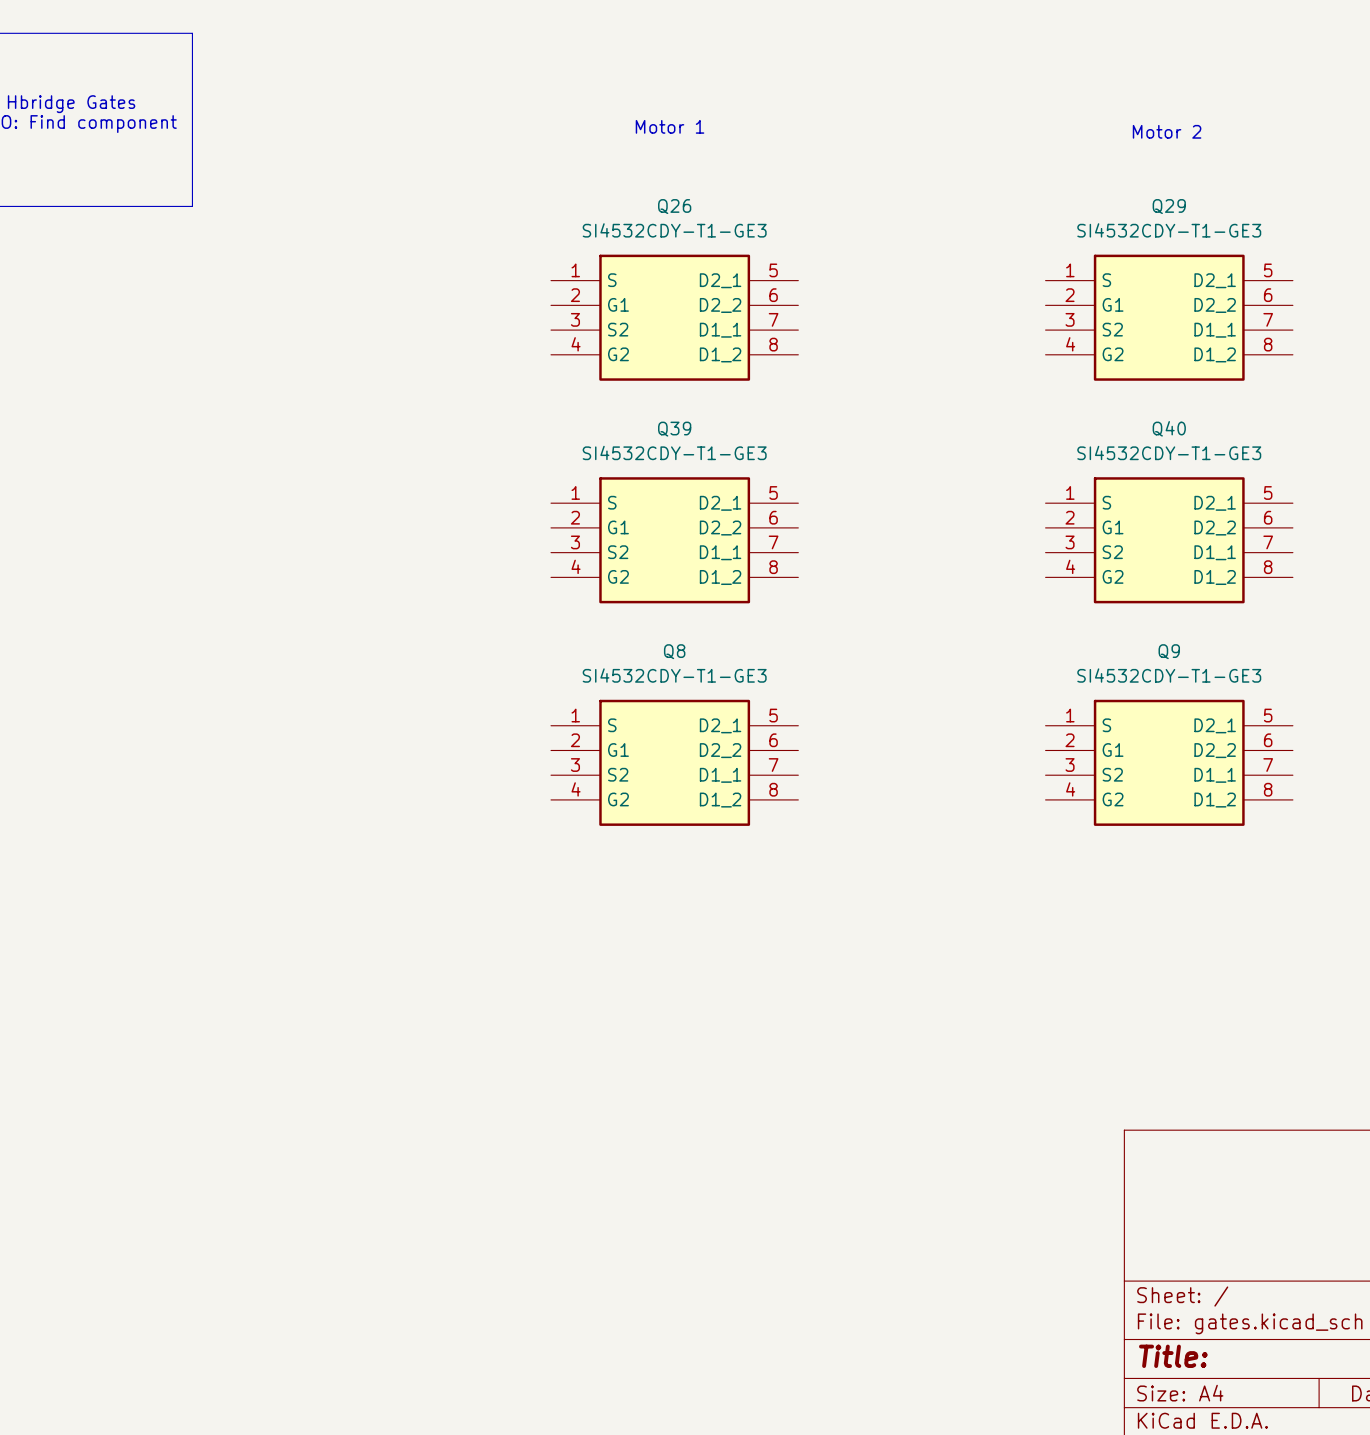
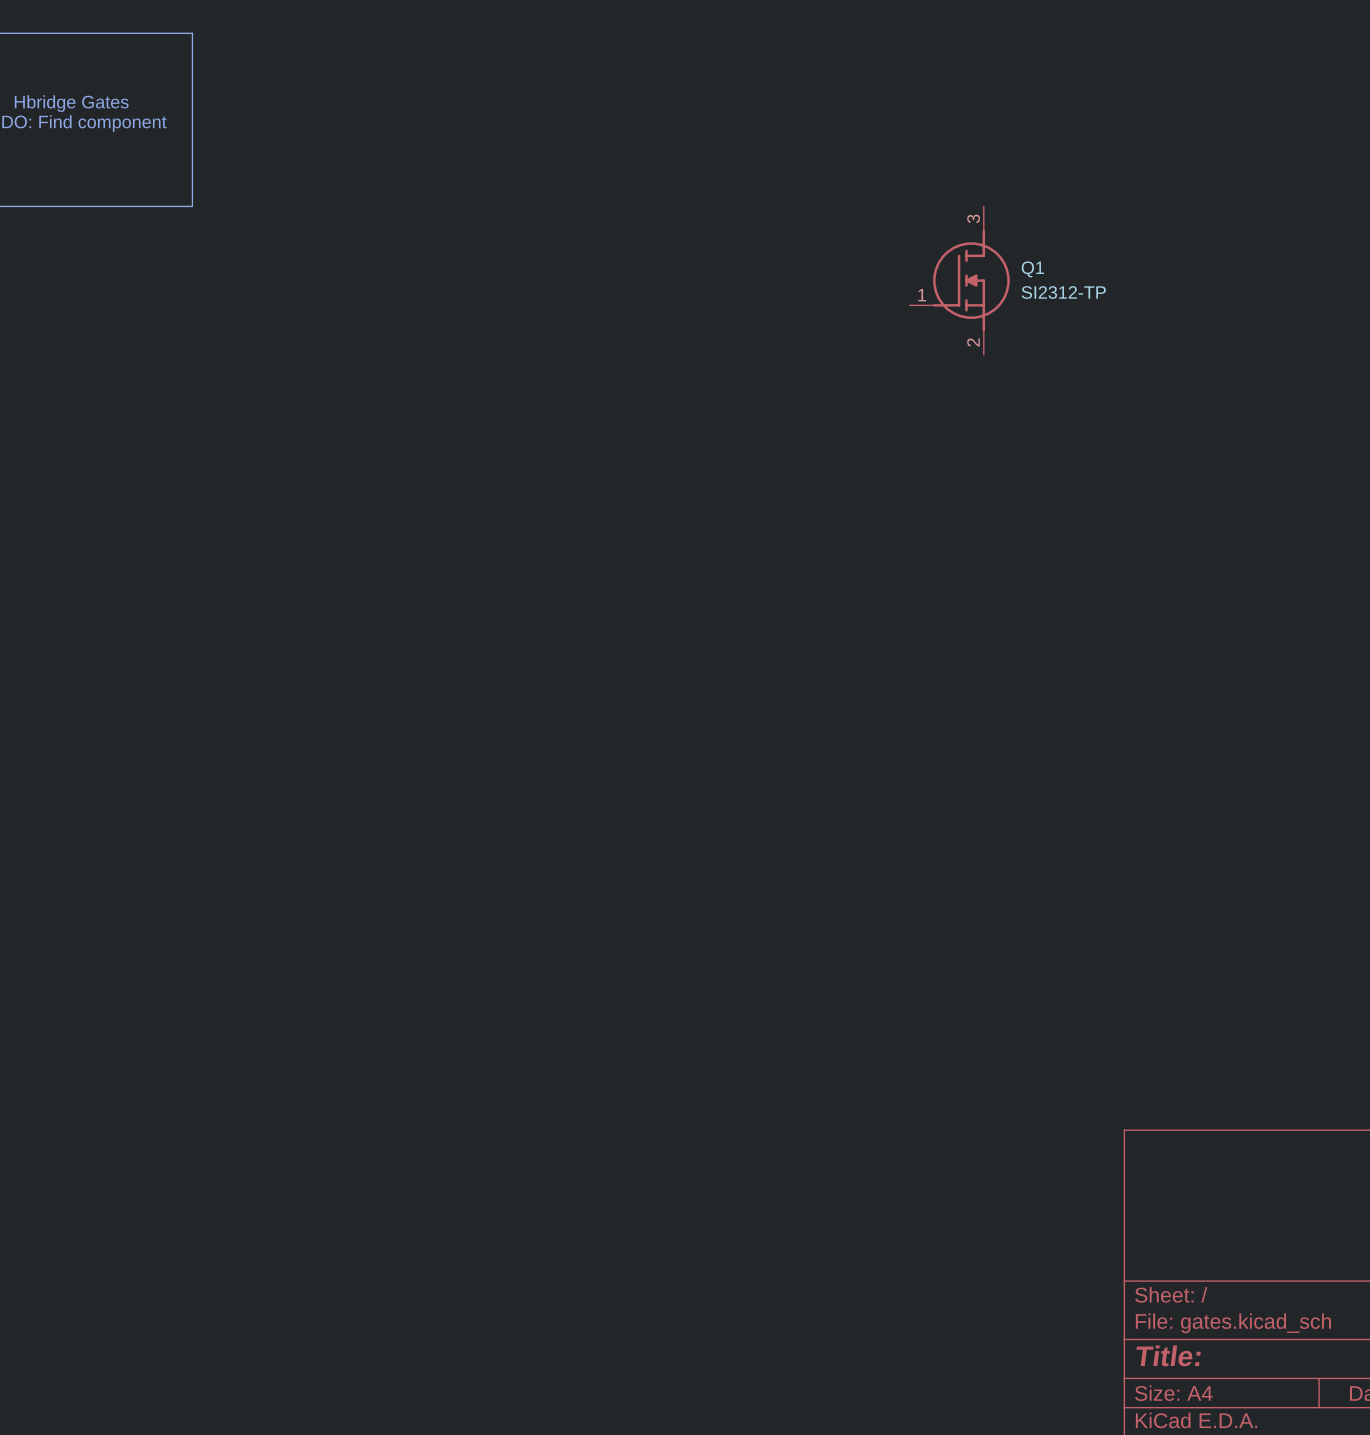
text: Motor 1 (670, 126) -> none
text: Motor 2 (1167, 131) -> none
Q1: none -> SI2312-TP (959, 280)
Q26: SI4532CDY-T1-GE3 (674, 317) -> none
Q29: SI4532CDY-T1-GE3 (1169, 317) -> none
Q39: SI4532CDY-T1-GE3 (674, 540) -> none
Q40: SI4532CDY-T1-GE3 (1169, 540) -> none
Q8: SI4532CDY-T1-GE3 (674, 762) -> none
Q9: SI4532CDY-T1-GE3 (1169, 762) -> none

